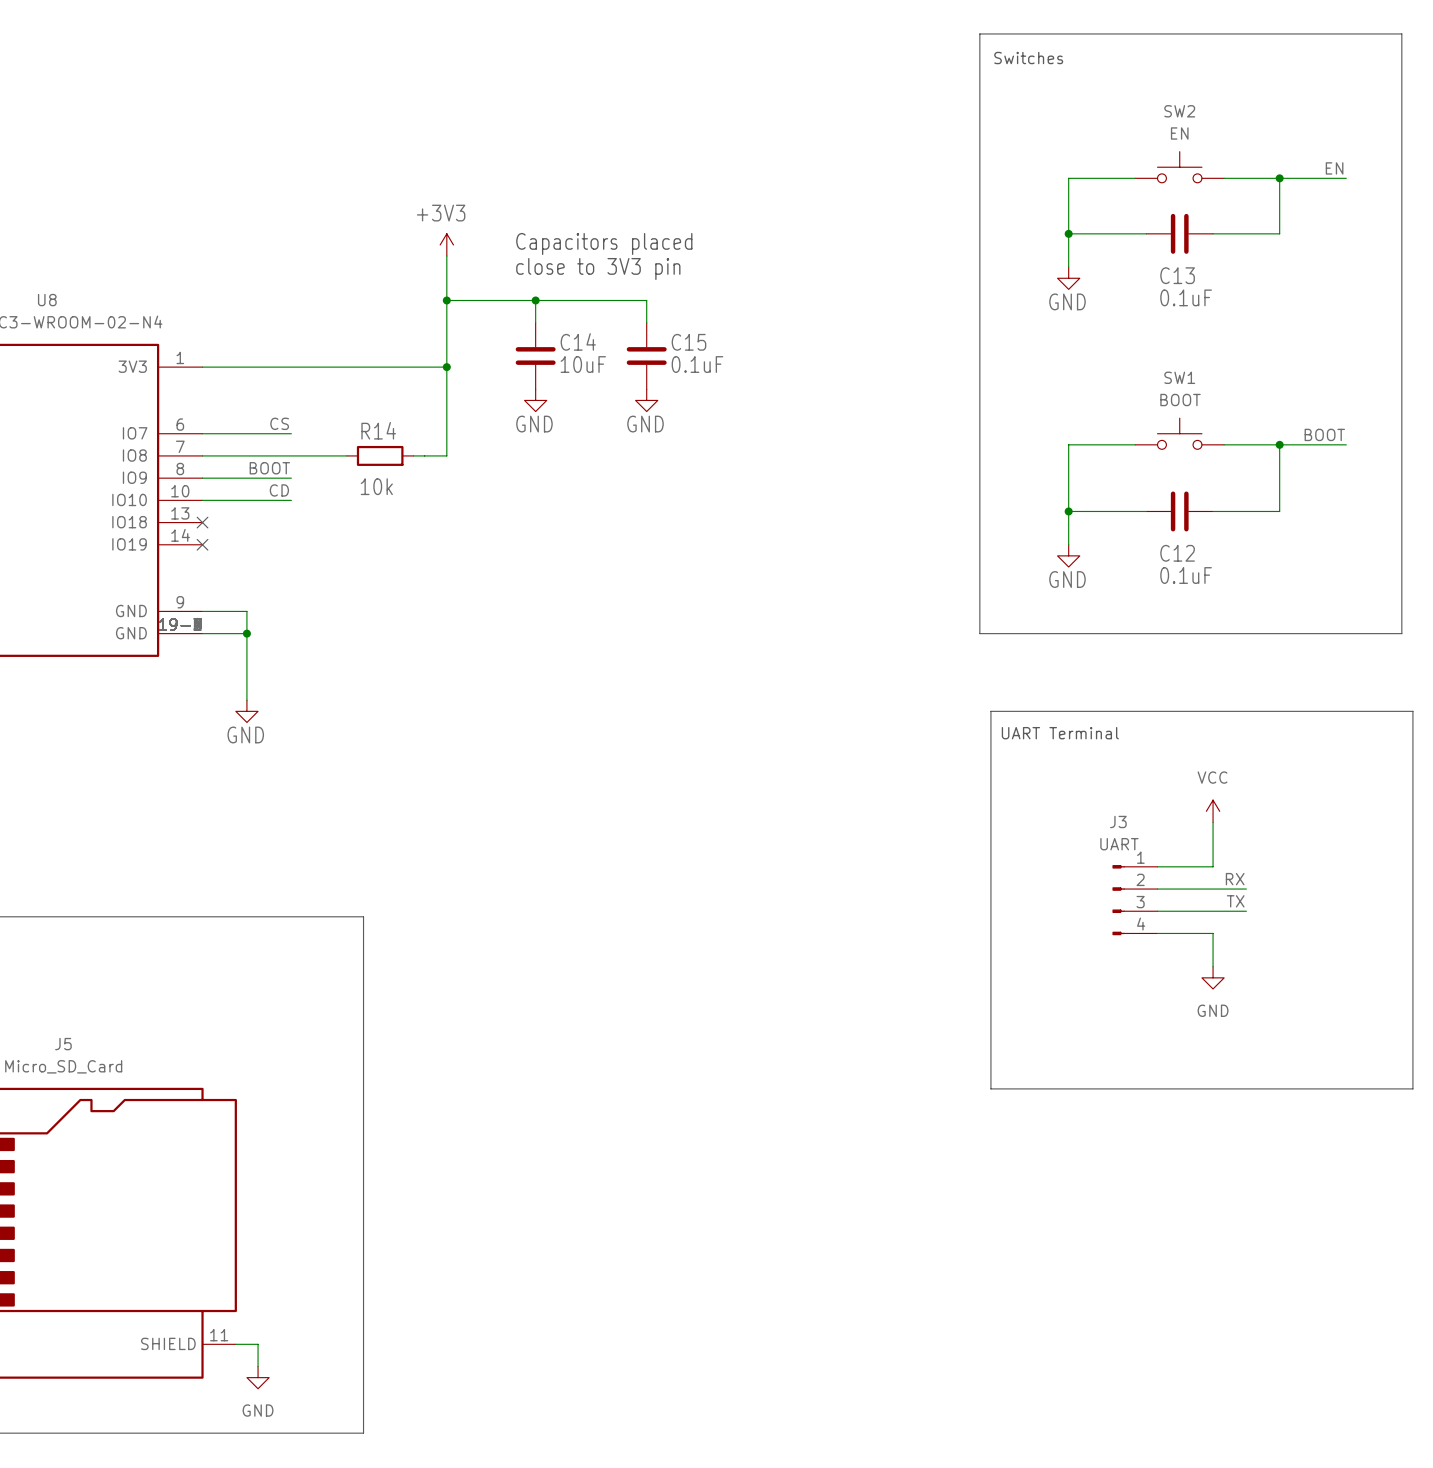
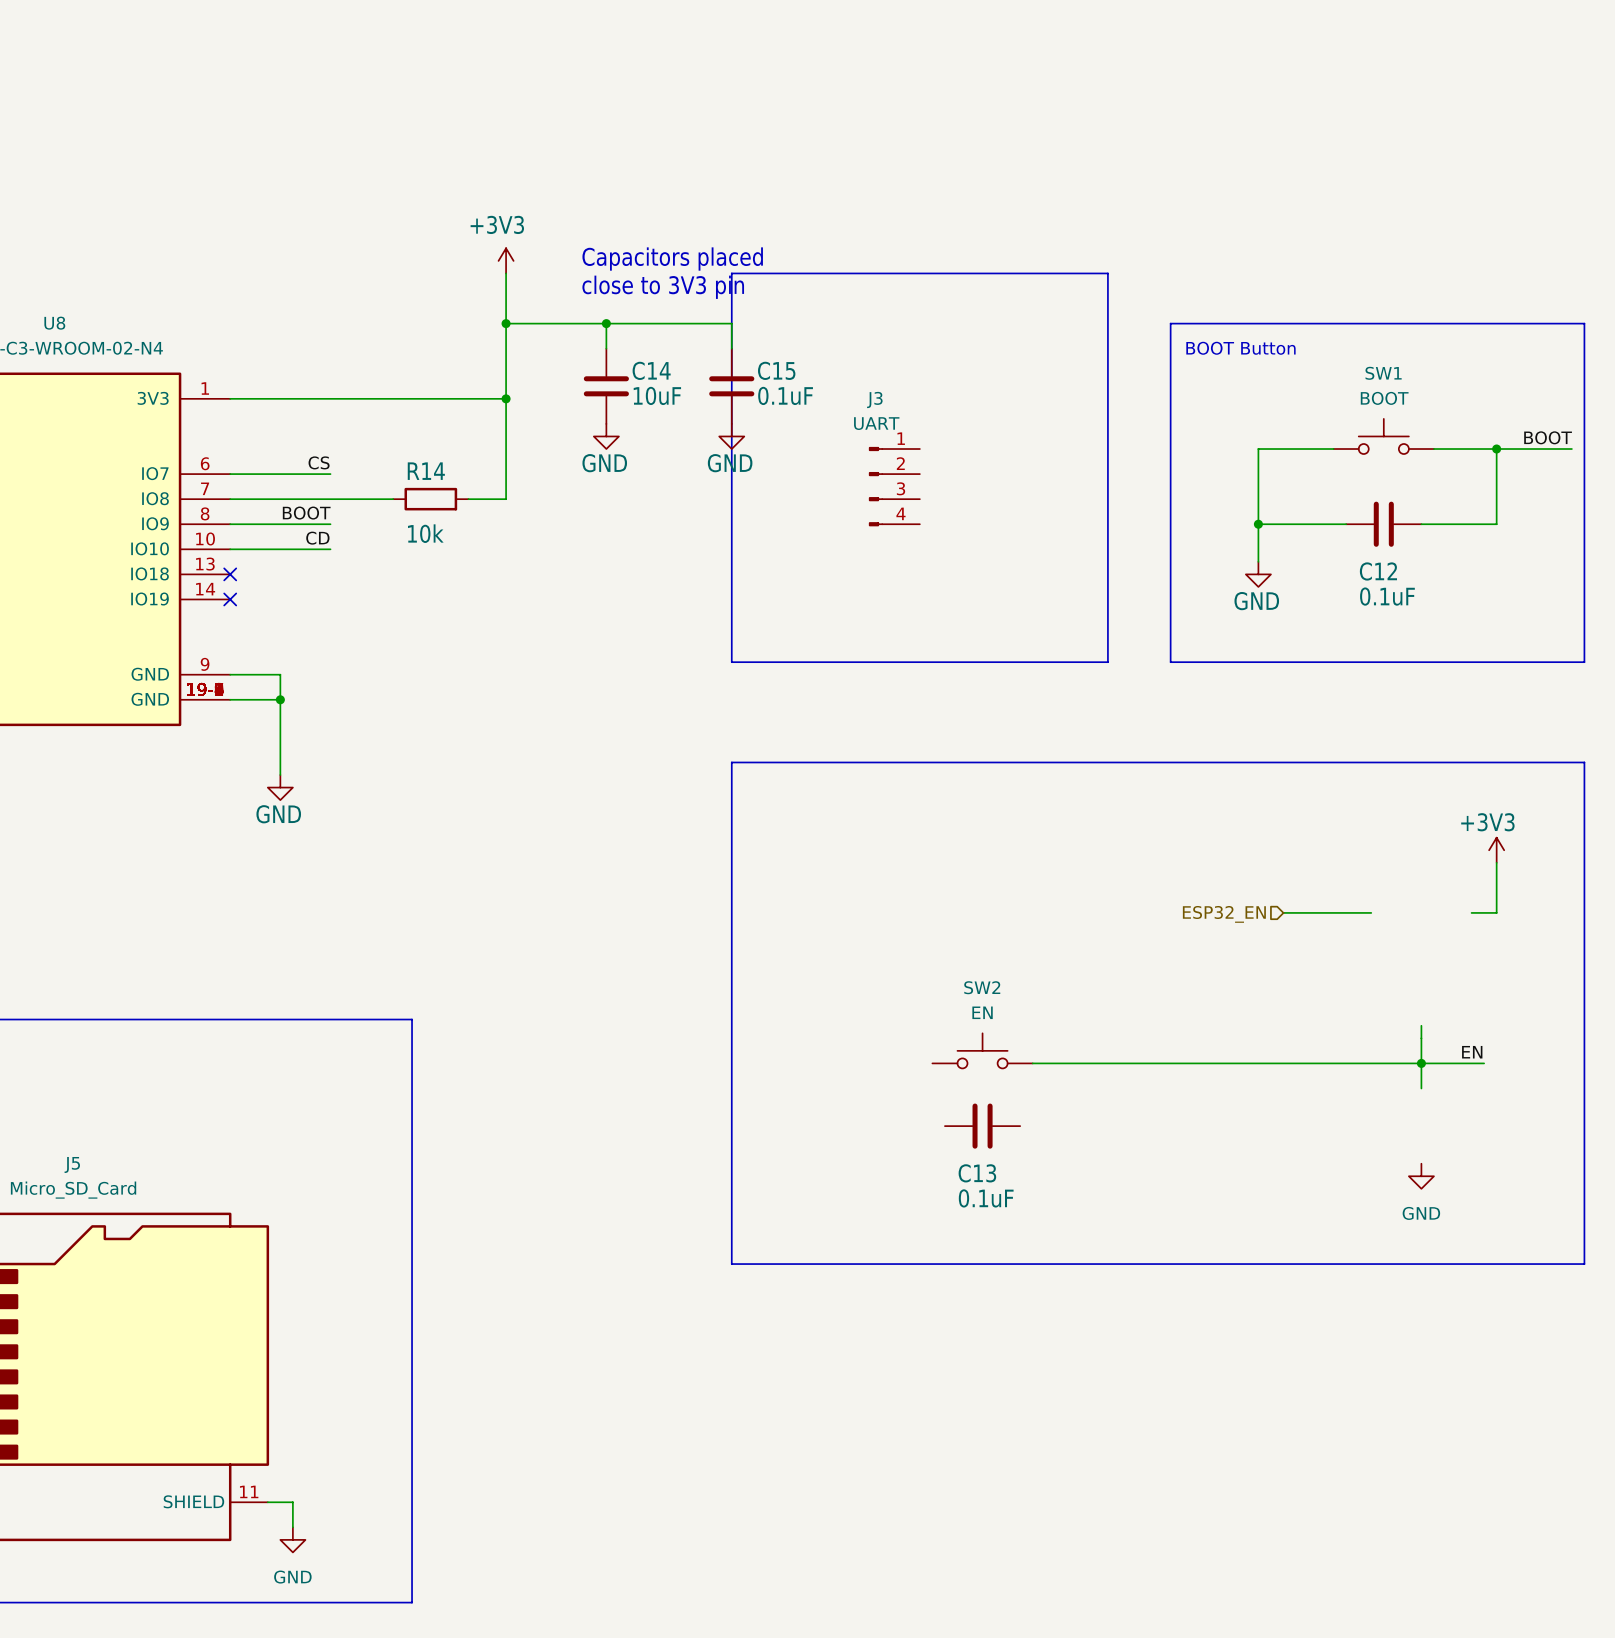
text: Switches (1028, 58) -> none
SW2 position: (1179, 167) -> (982, 1050)
label: EN (1334, 168) -> none
wire: (1135, 178) (1068, 178) (1068, 267) -> none
wire: (1224, 178) (1346, 178) -> none
wire: (1279, 178) (1279, 233) (1213, 233) -> none
junction: (1279, 178) -> none
wire: (1068, 233) (1146, 233) -> none
junction: (1068, 233) -> none
C13 position: (1179, 233) -> (982, 1126)
line: (979, 256) (979, 33) (1401, 33) (1401, 300) -> (1107, 273) (731, 273) (731, 662) (1107, 662)
power symbol: GND (1068, 278) -> none
text: none -> BOOT Button (1240, 348)
junction: none -> (1496, 449)
SW1 position: (1179, 433) -> (1383, 436)
label position: BOOT (1324, 434) -> BOOT (1548, 437)
wire: (1135, 444) (1068, 444) (1068, 544) -> (1333, 449) (1258, 449) (1258, 561)
wire: (1224, 444) (1346, 444) -> (1433, 449) (1571, 449)
wire: (1279, 444) (1279, 511) (1213, 511) -> (1496, 449) (1496, 524) (1421, 524)
junction: (1279, 444) -> none
junction: none -> (1258, 524)
wire: (1068, 511) (1146, 511) -> (1258, 524) (1346, 524)
junction: (1068, 511) -> none
C12 position: (1179, 511) -> (1383, 524)
power symbol position: GND (1068, 555) -> GND (1258, 574)
line: (979, 600) (979, 633) (1401, 633) (1401, 600) -> (1584, 323) (1170, 323) (1170, 662) (1584, 662)
line: none -> (731, 762) (731, 1264) (1584, 1264) (1584, 762) (731, 762)
line: (990, 711) (1412, 711) (1412, 1088) (990, 1088) (990, 711) -> none
text: UART Terminal (1060, 733) -> none
power symbol: none -> +3V3 (1496, 850)
wire: none -> (1496, 862) (1496, 912) (1471, 912)
power symbol: VCC (1213, 811) -> none
hierarchical label: none -> ESP32_EN (1224, 914)
wire: (1213, 822) (1213, 866) (1157, 866) -> (1371, 912) (1283, 912)
label: RX (1235, 879) -> none
wire: (1157, 889) (1246, 889) -> none
J3 position: (1134, 900) -> (894, 486)
label: TX (1235, 901) -> none
wire: (1157, 911) (1246, 911) -> none
wire: none -> (1421, 1025) (1421, 1088)
wire: (1157, 933) (1213, 933) (1213, 966) -> none
label: none -> EN (1472, 1052)
wire: none -> (1032, 1063) (1484, 1063)
junction: none -> (1421, 1063)
power symbol position: GND (1213, 977) -> GND (1421, 1176)

